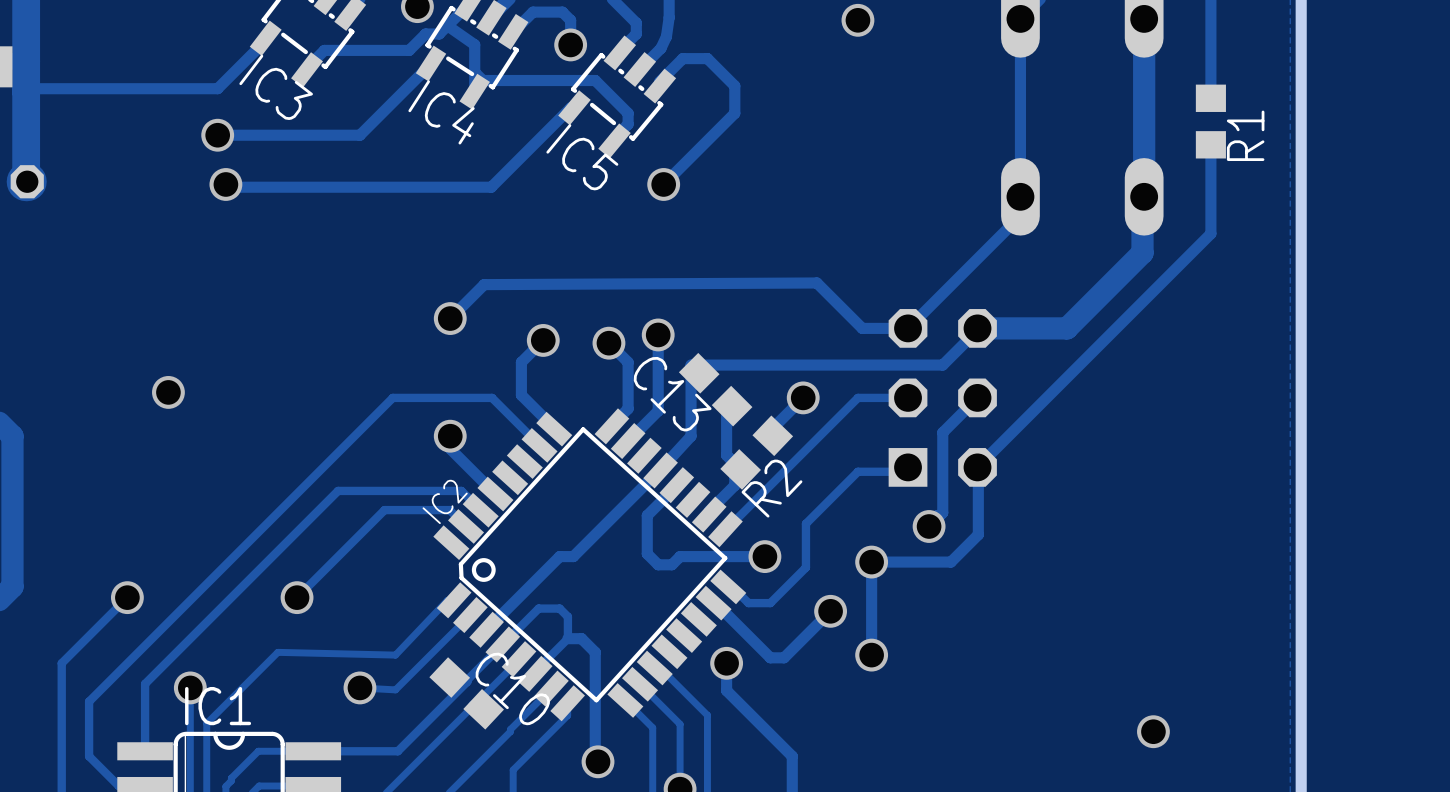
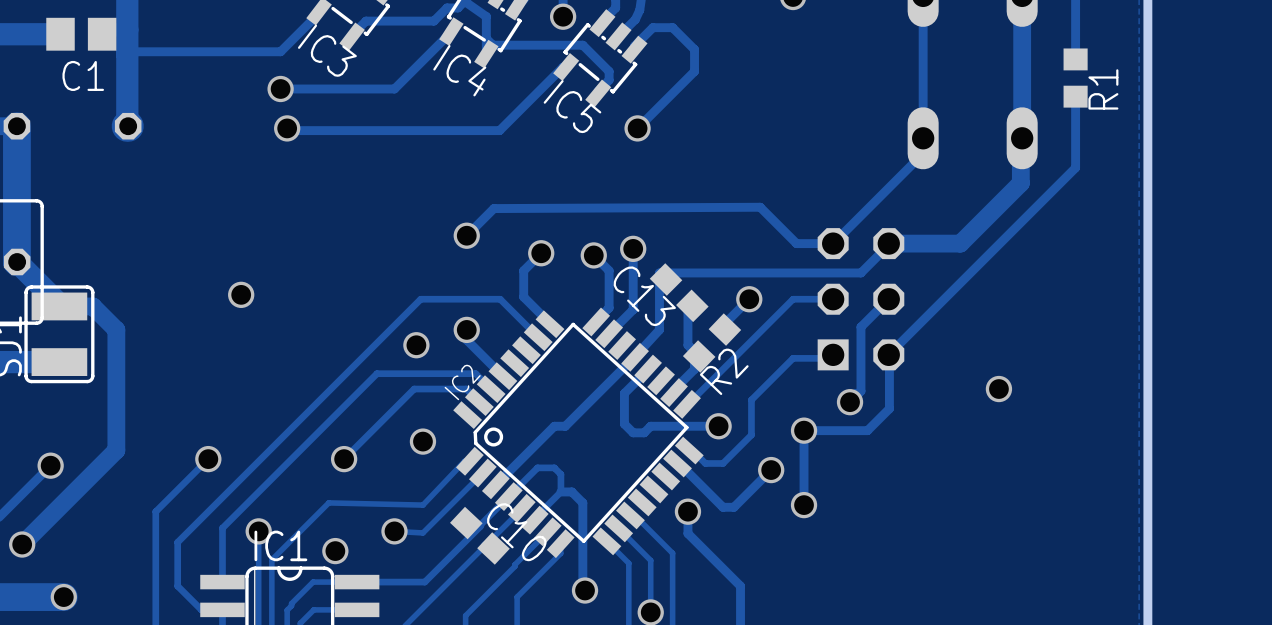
via: none -> (416, 345)
via: none -> (998, 389)
via: none -> (422, 441)
via: none -> (335, 551)
via: (1153, 731) -> none

